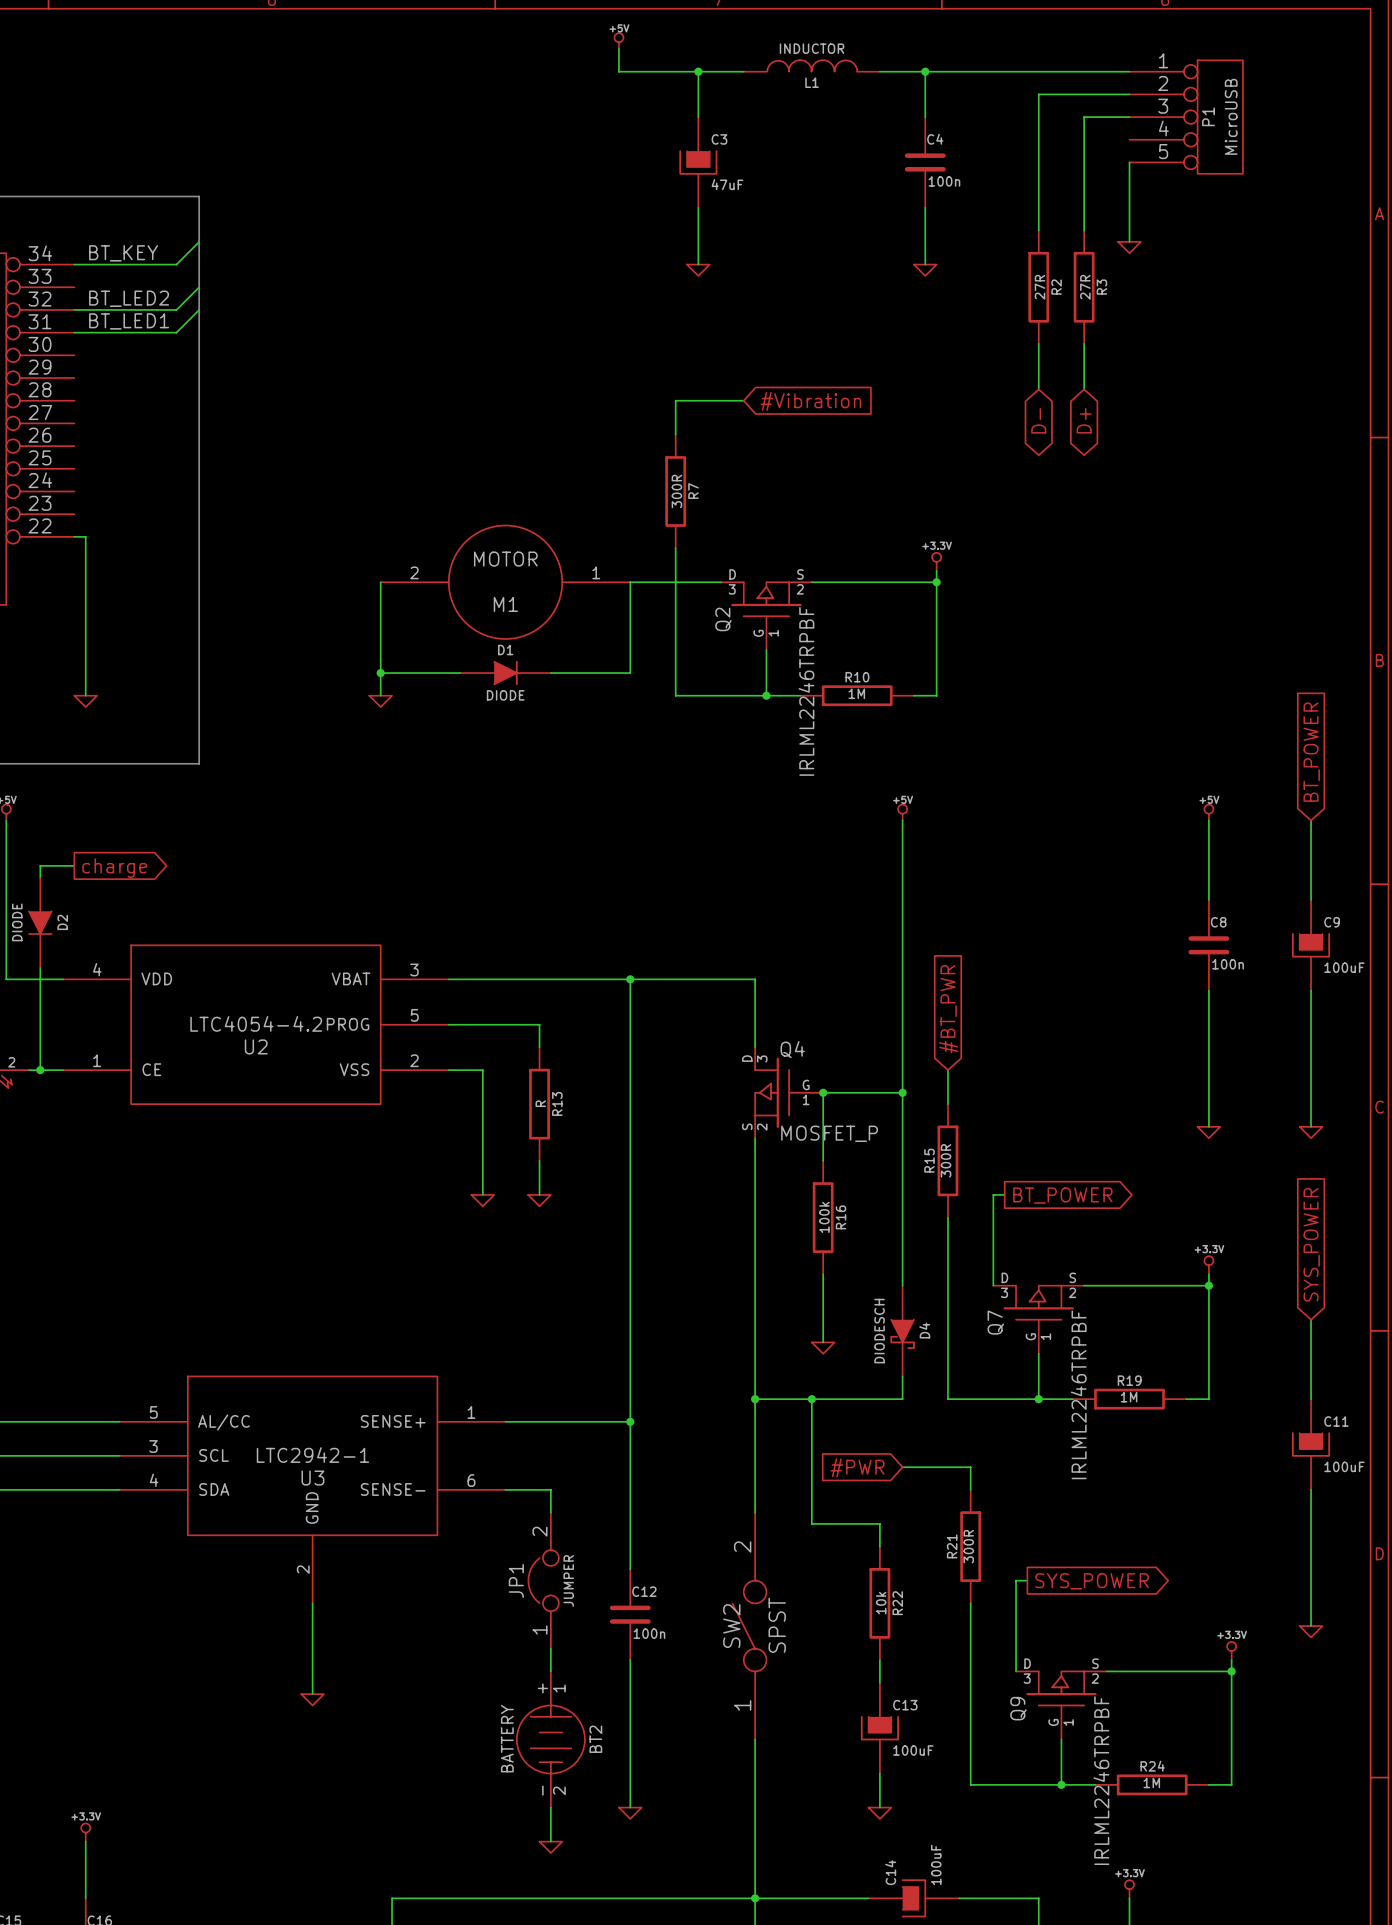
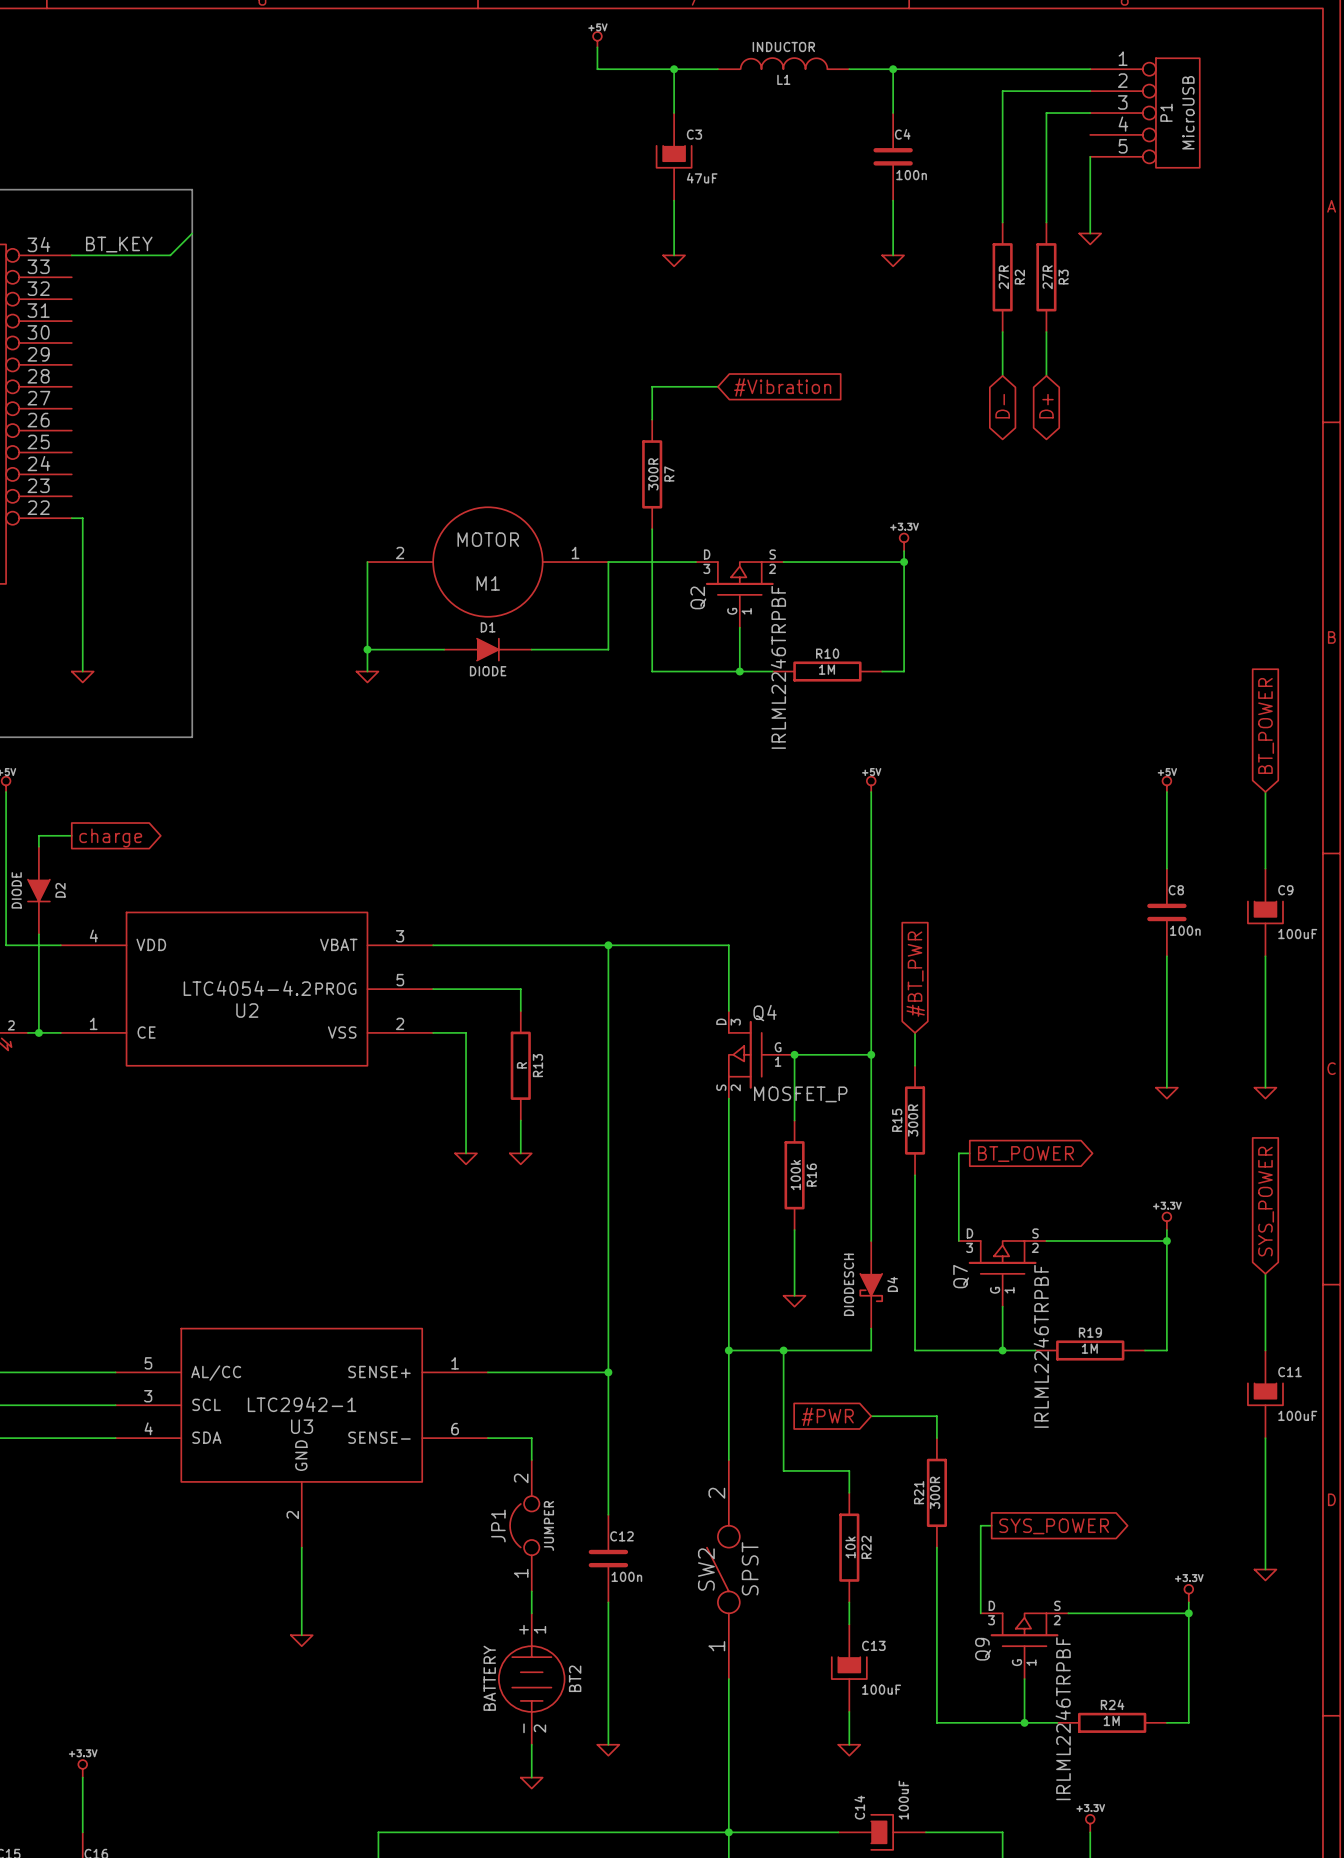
wire: (199, 287) (176, 309) (74, 309) -> none
label: BT_LED2 (129, 298) -> none
wire: (199, 309) (176, 332) (74, 332) -> none
label: BT_LED1 (129, 321) -> none

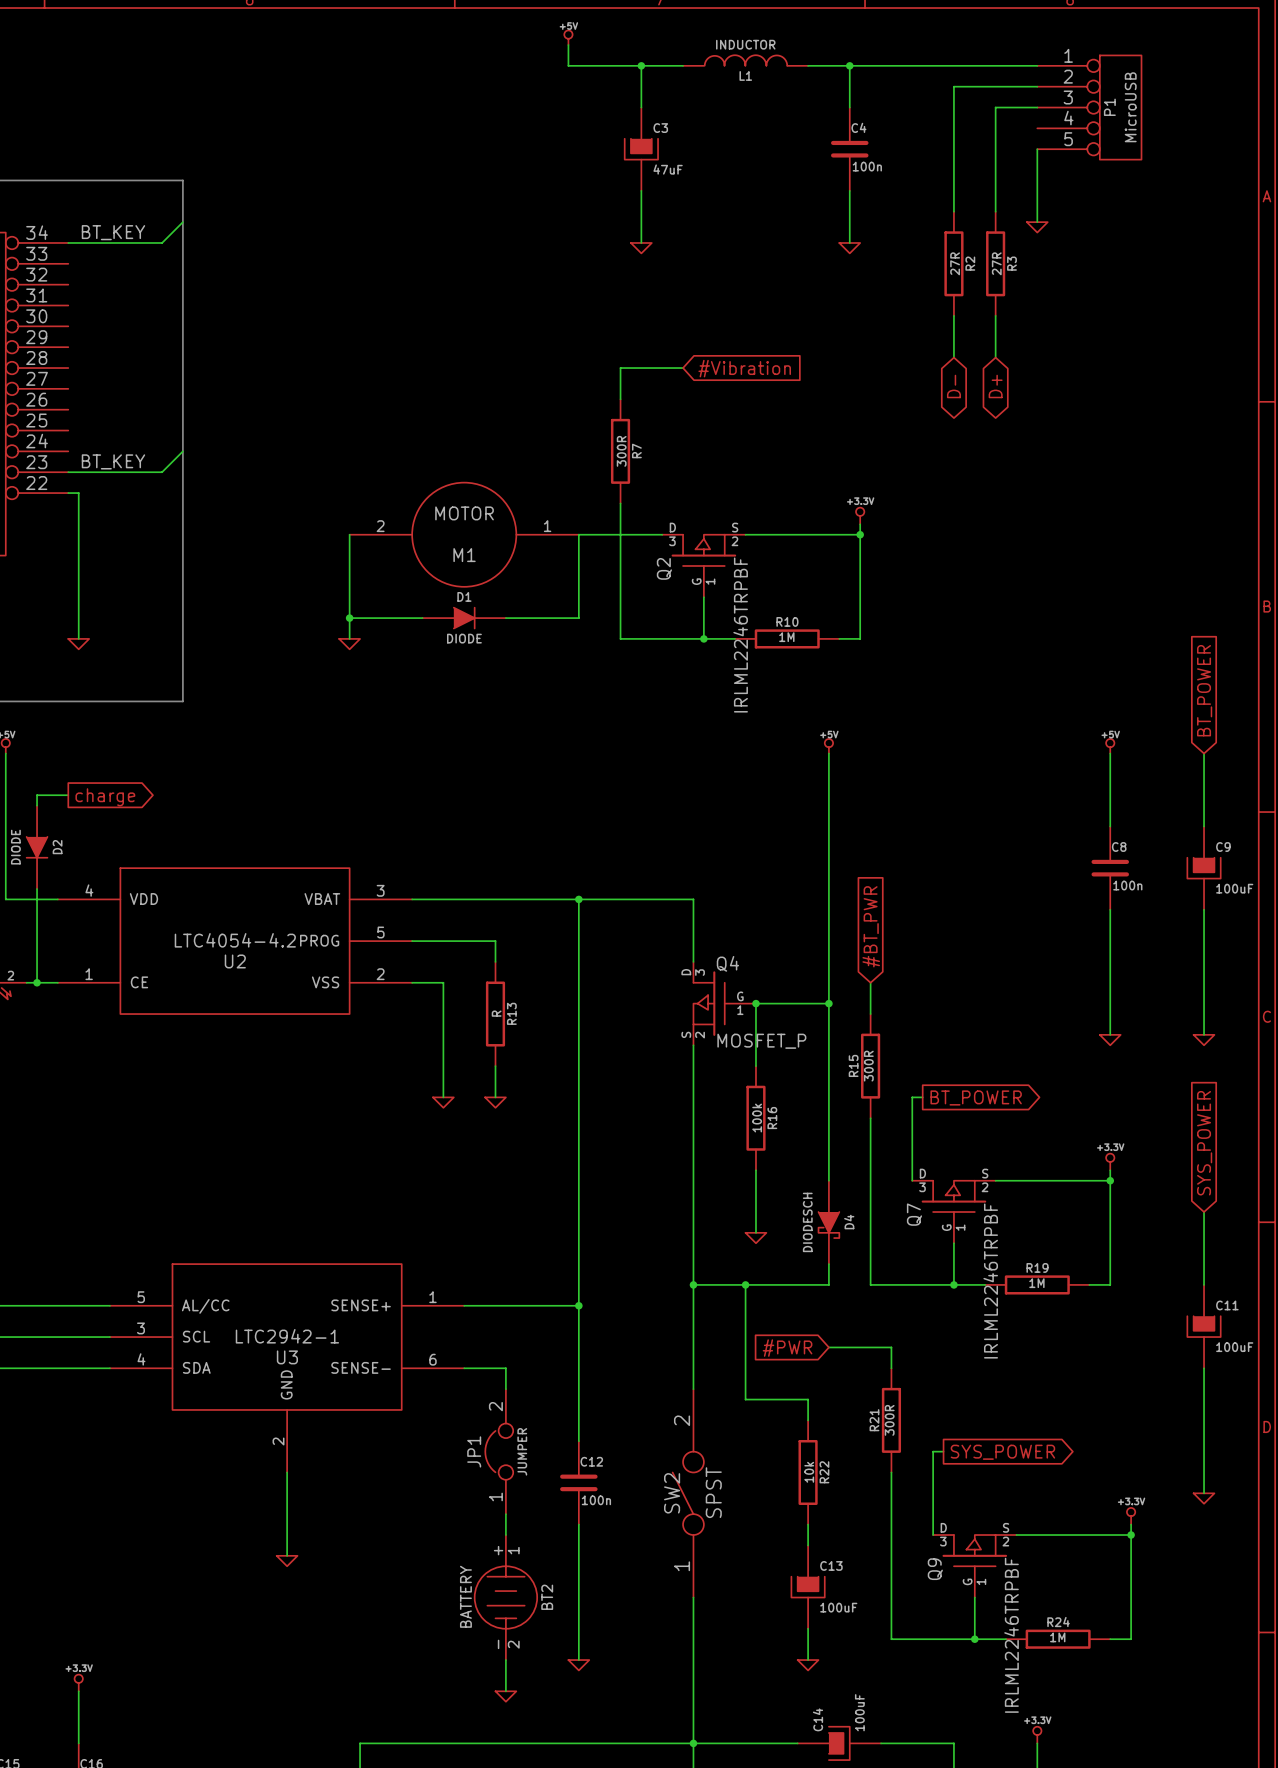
wire: none -> (182, 451) (162, 472) (68, 472)
label: none -> BT_KEY (113, 461)

